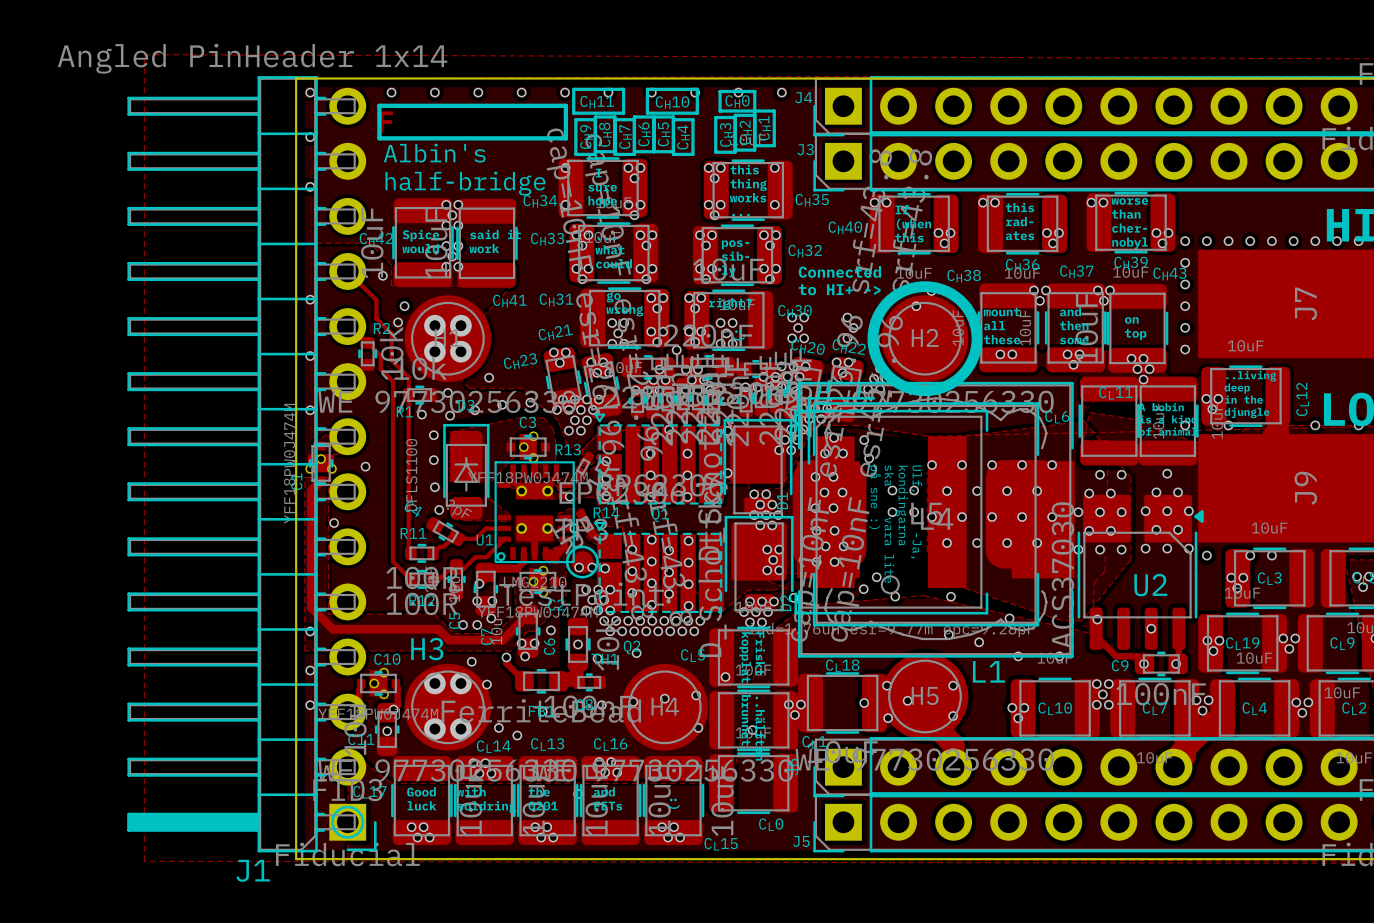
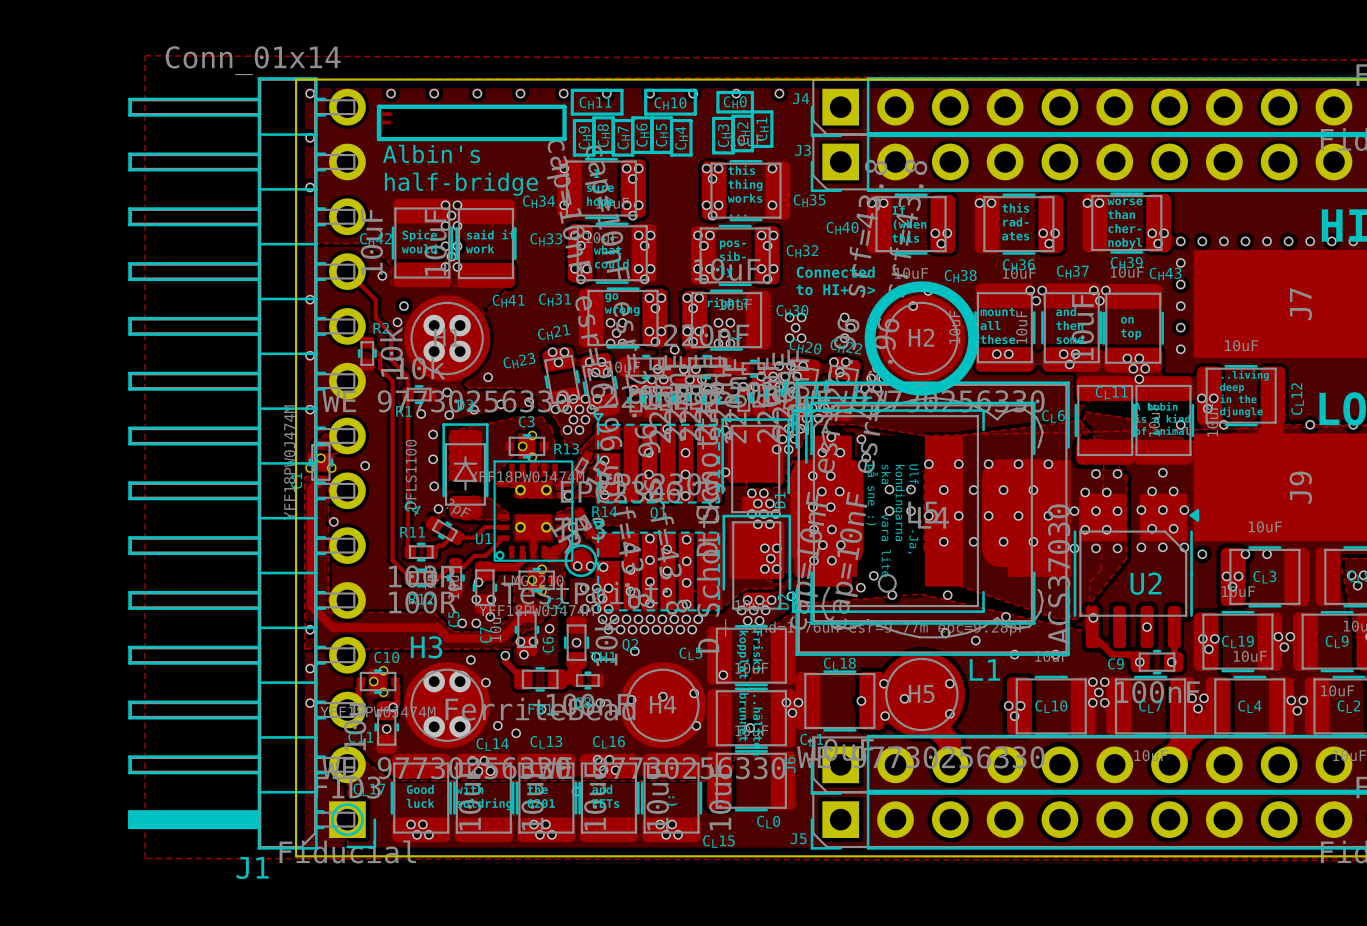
J1 value: Angled PinHeader 1x14 (252, 58) -> Conn_01x14 (253, 60)

